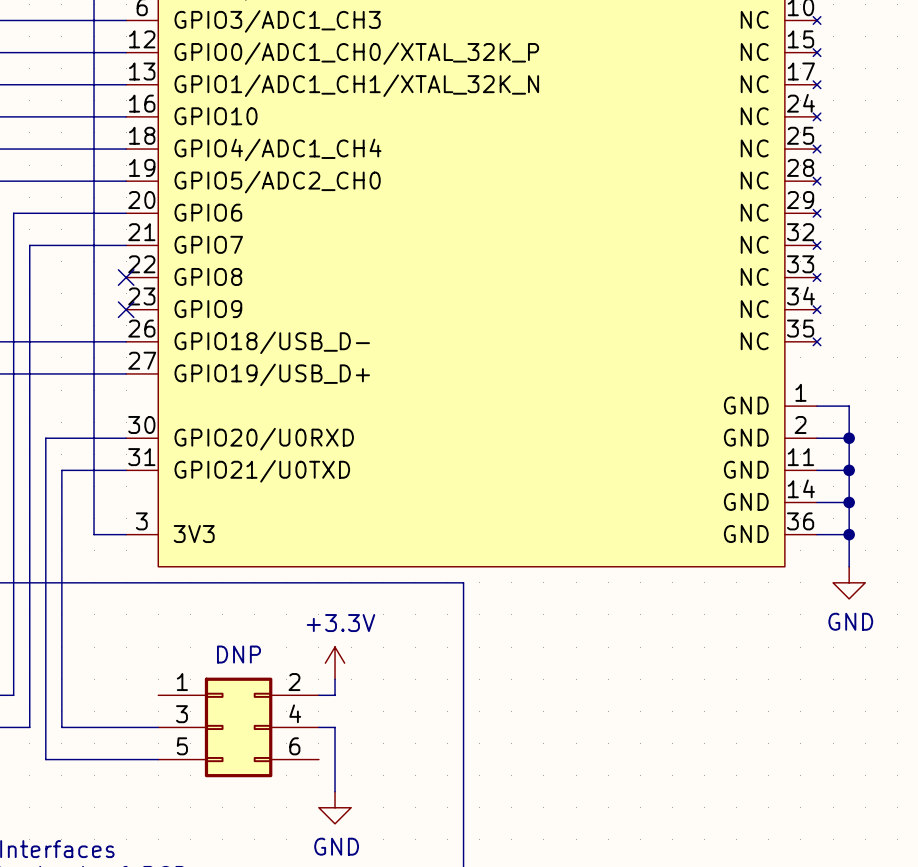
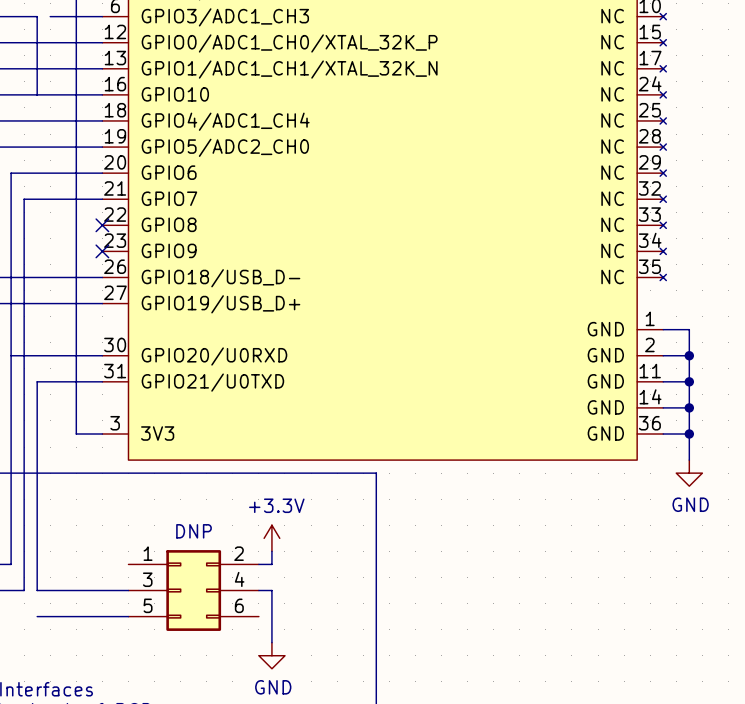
wire: (45, 20) (61, 20) -> (37, 16) (37, 94)
wire: none -> (11, 355) (37, 355)
wire: (45, 438) (45, 470) -> (50, 381) (37, 381)
wire: (61, 470) (61, 727) -> none
wire: (45, 727) (45, 759) -> (37, 590) (50, 590)

